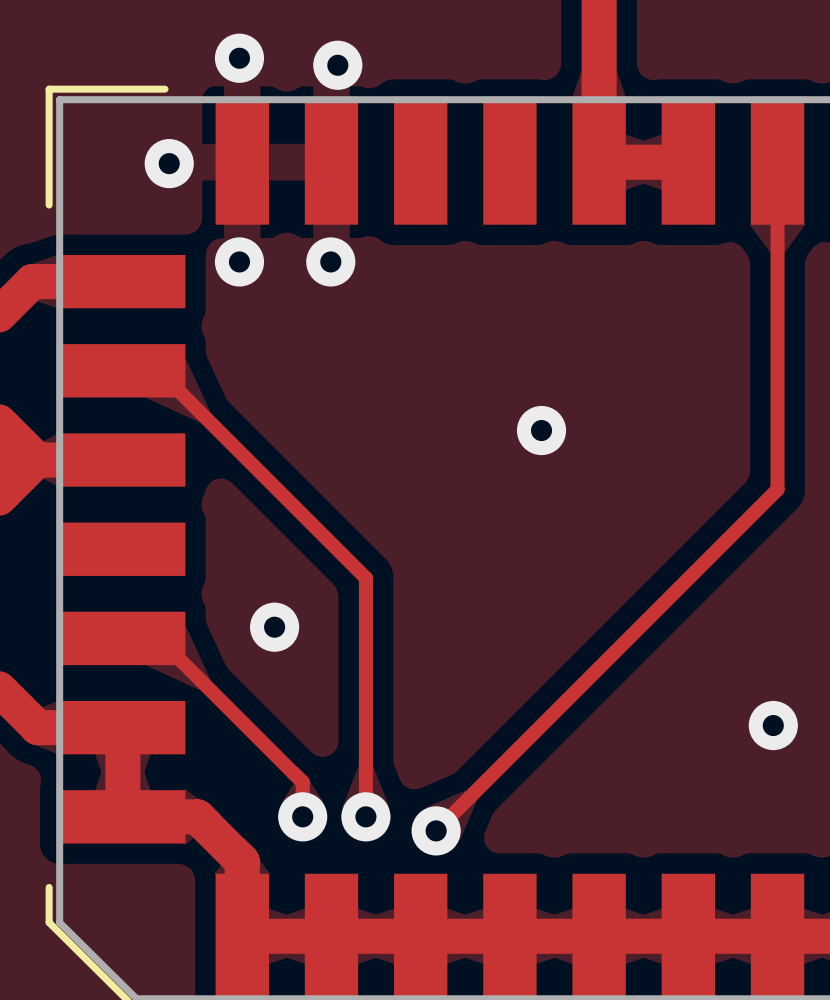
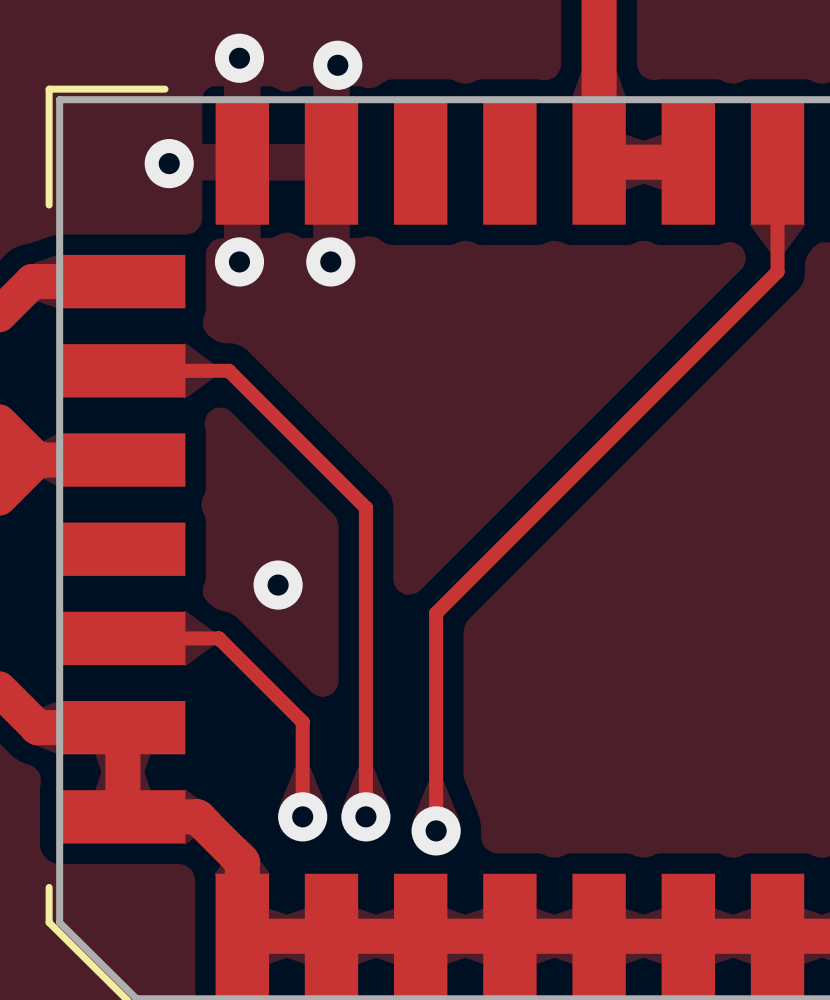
track: (777, 271) (777, 489) (436, 830) -> (777, 271) (436, 613) (436, 830)
track: (158, 370) (365, 578) -> (158, 370) (228, 370) (365, 507) (365, 578)
via: (541, 430) -> none
via position: (274, 627) -> (278, 585)
track: (158, 638) (302, 782) -> (158, 638) (219, 638) (302, 722) (302, 782)
via: (773, 725) -> none

